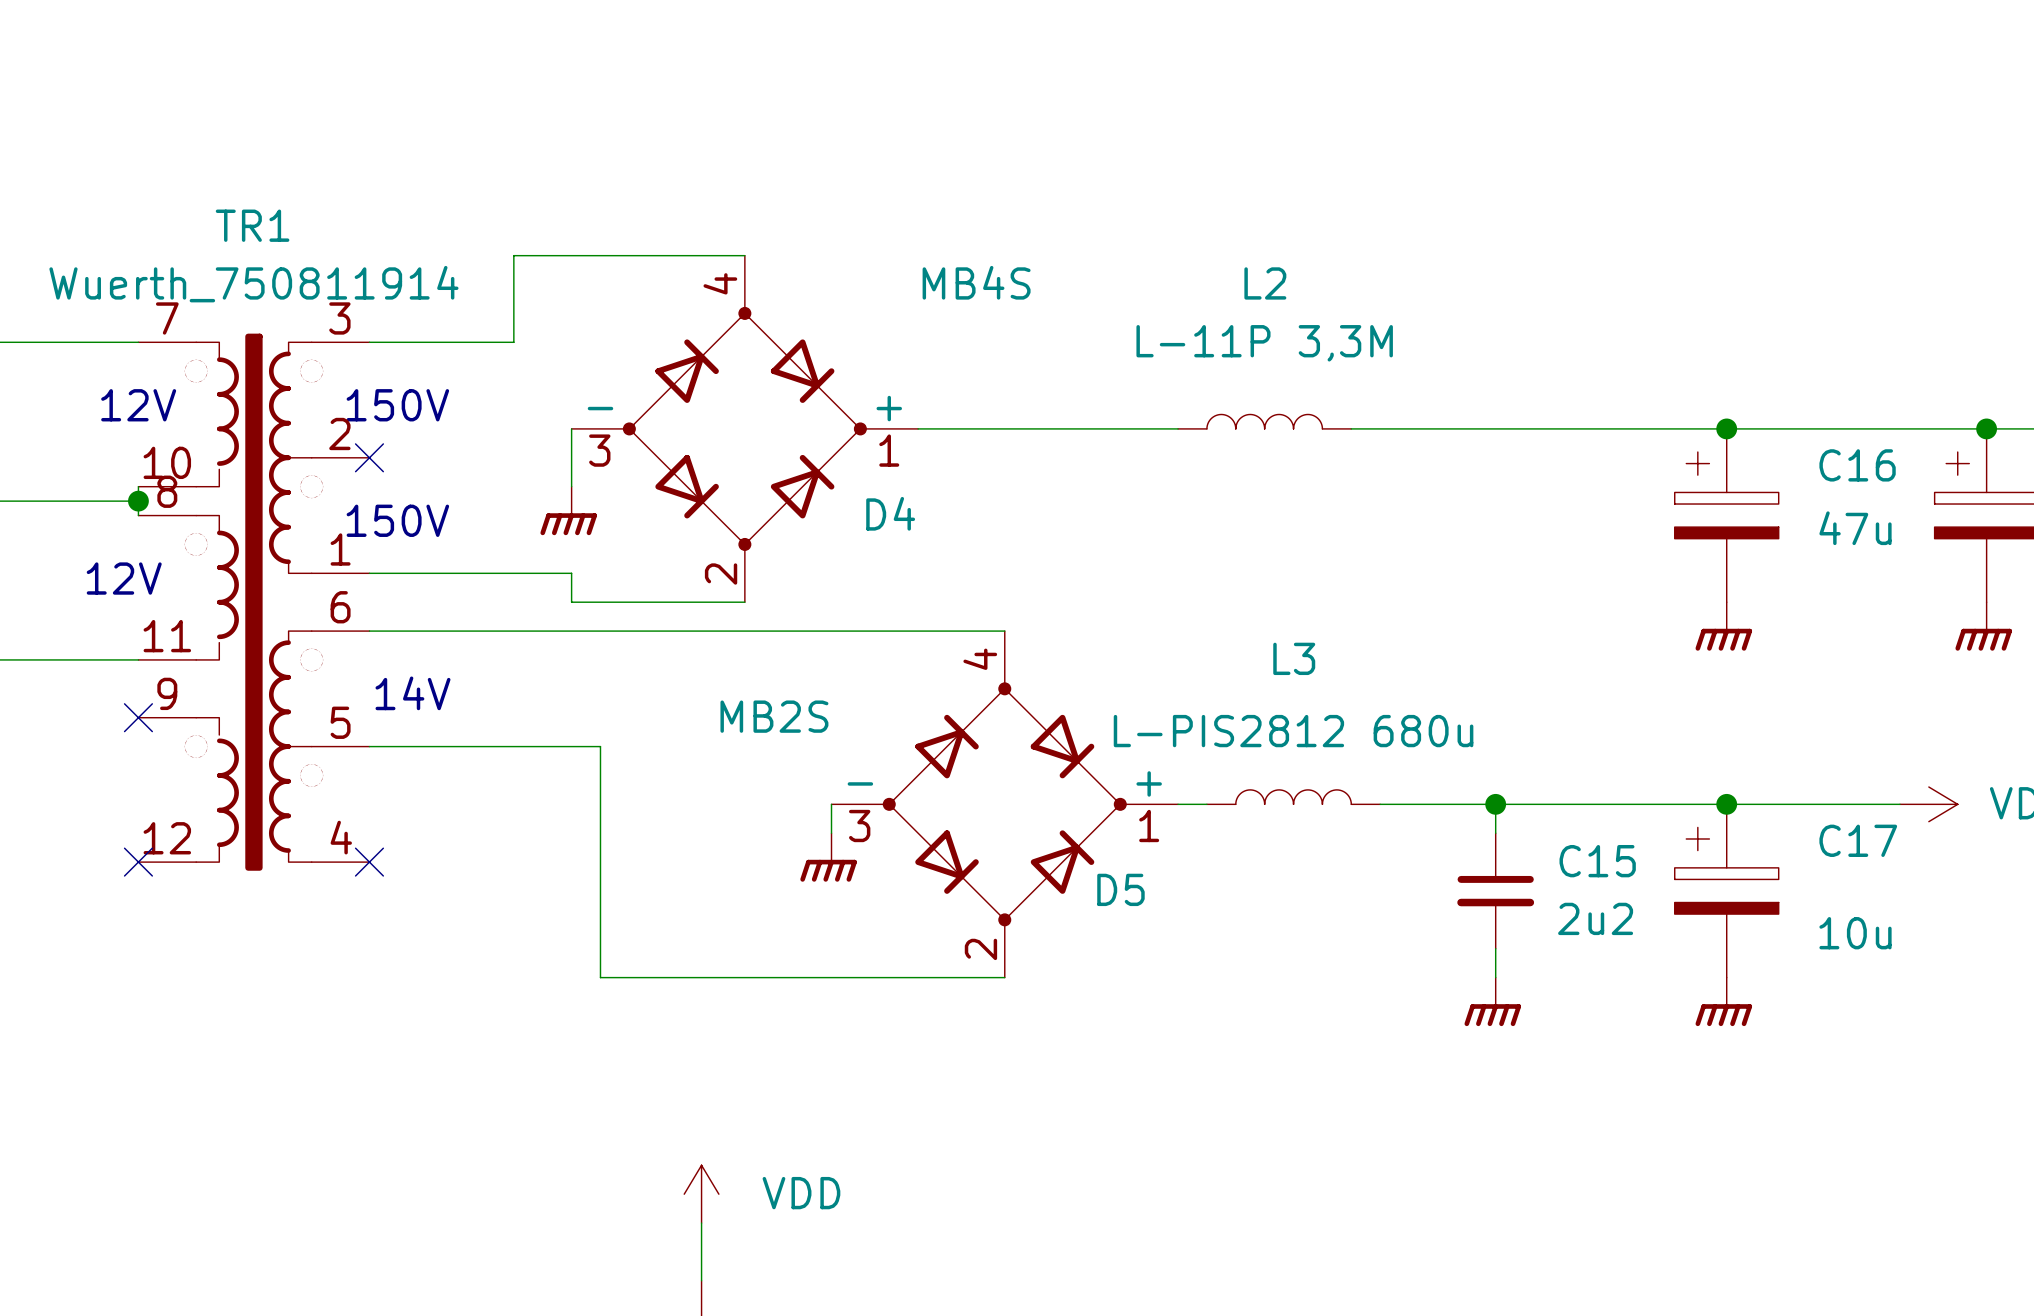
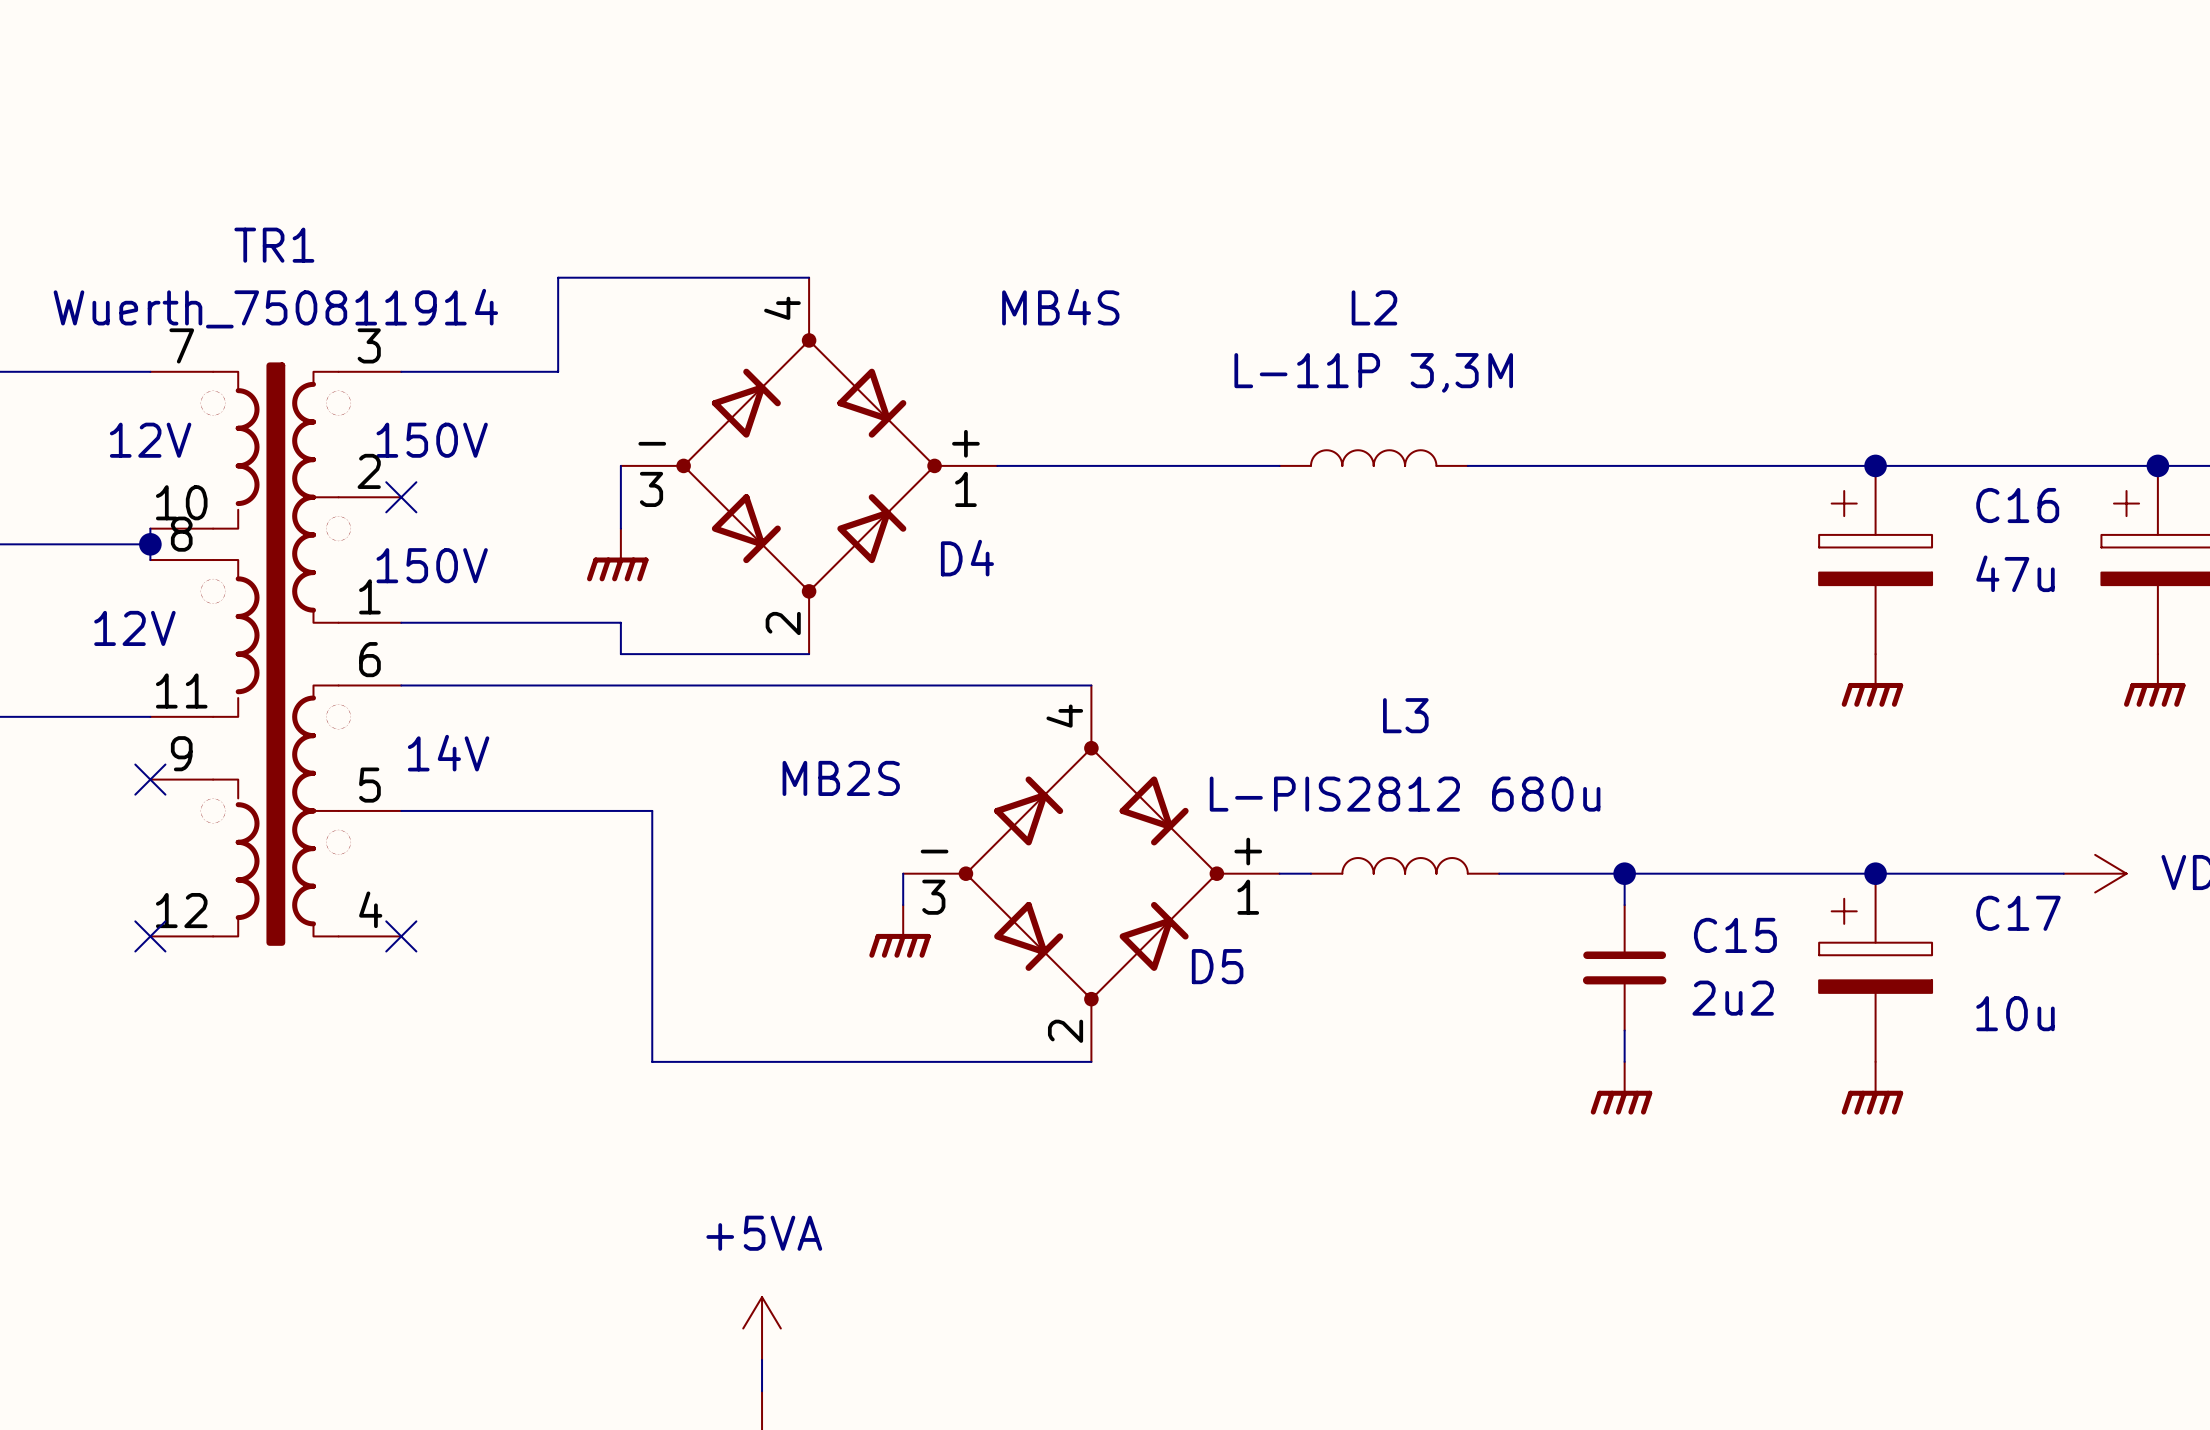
power symbol: VDD (701, 1194) -> none
power symbol: none -> +5VA (762, 1328)

